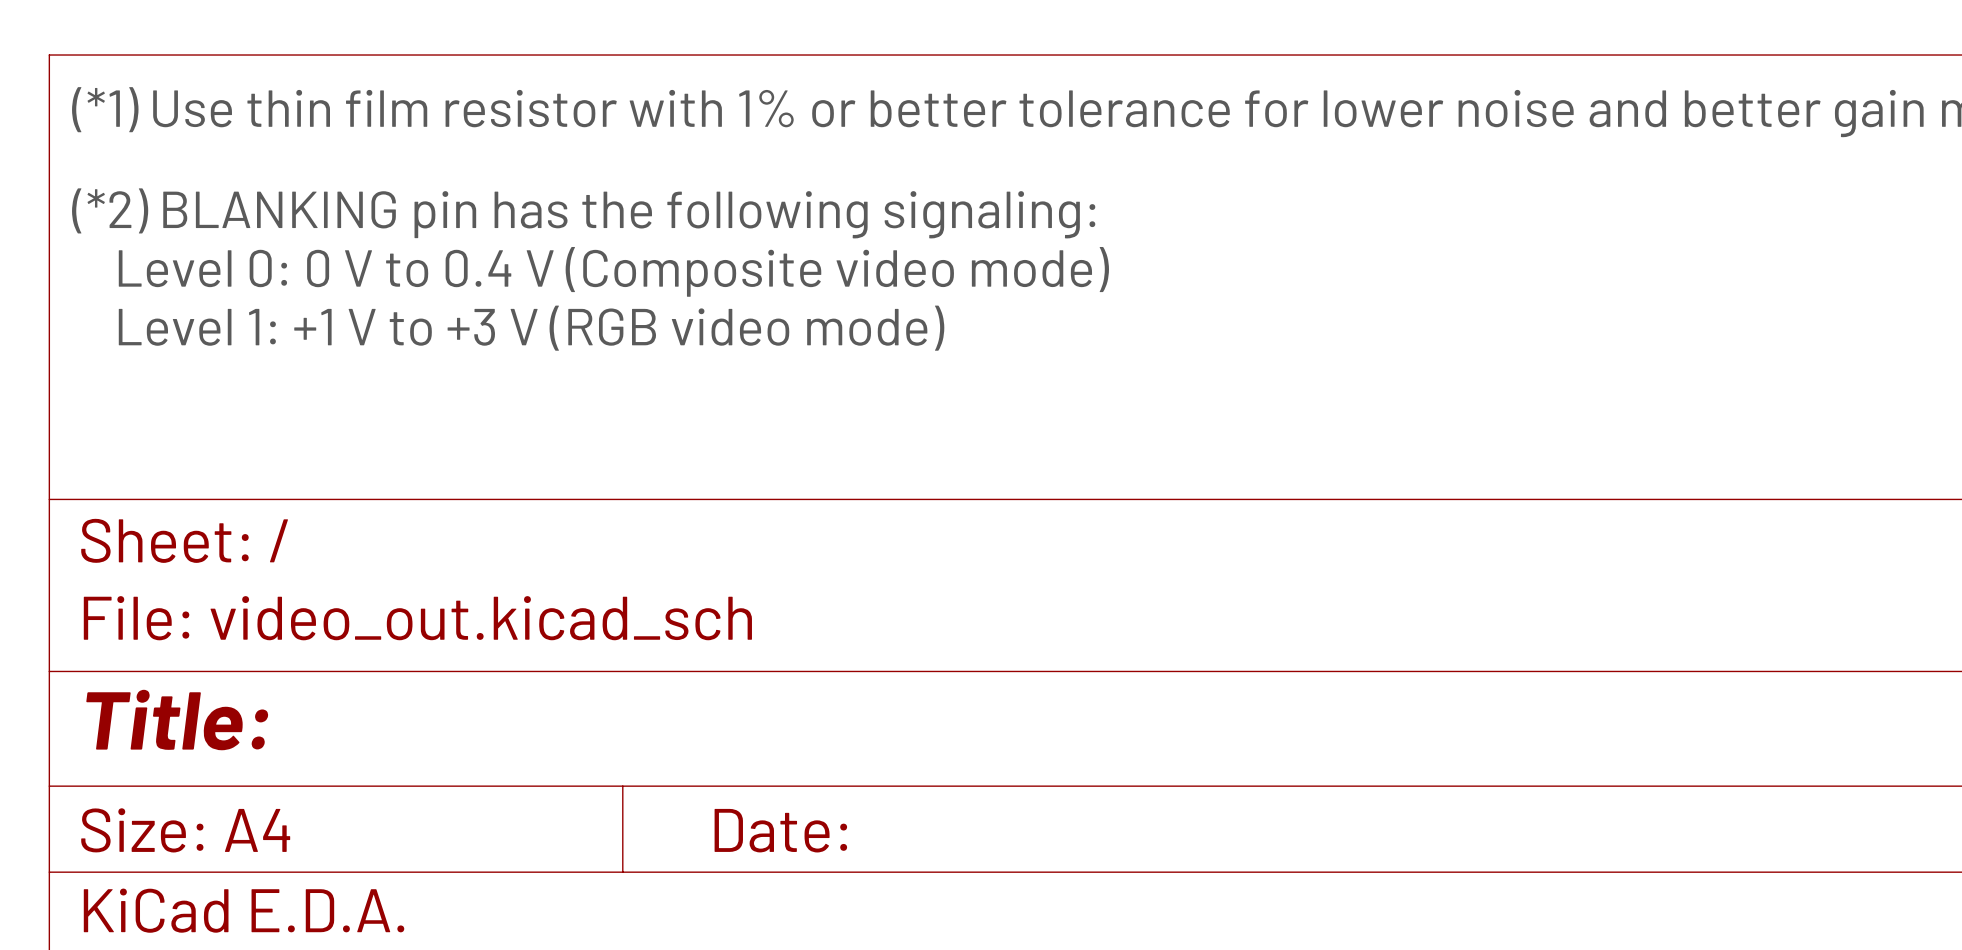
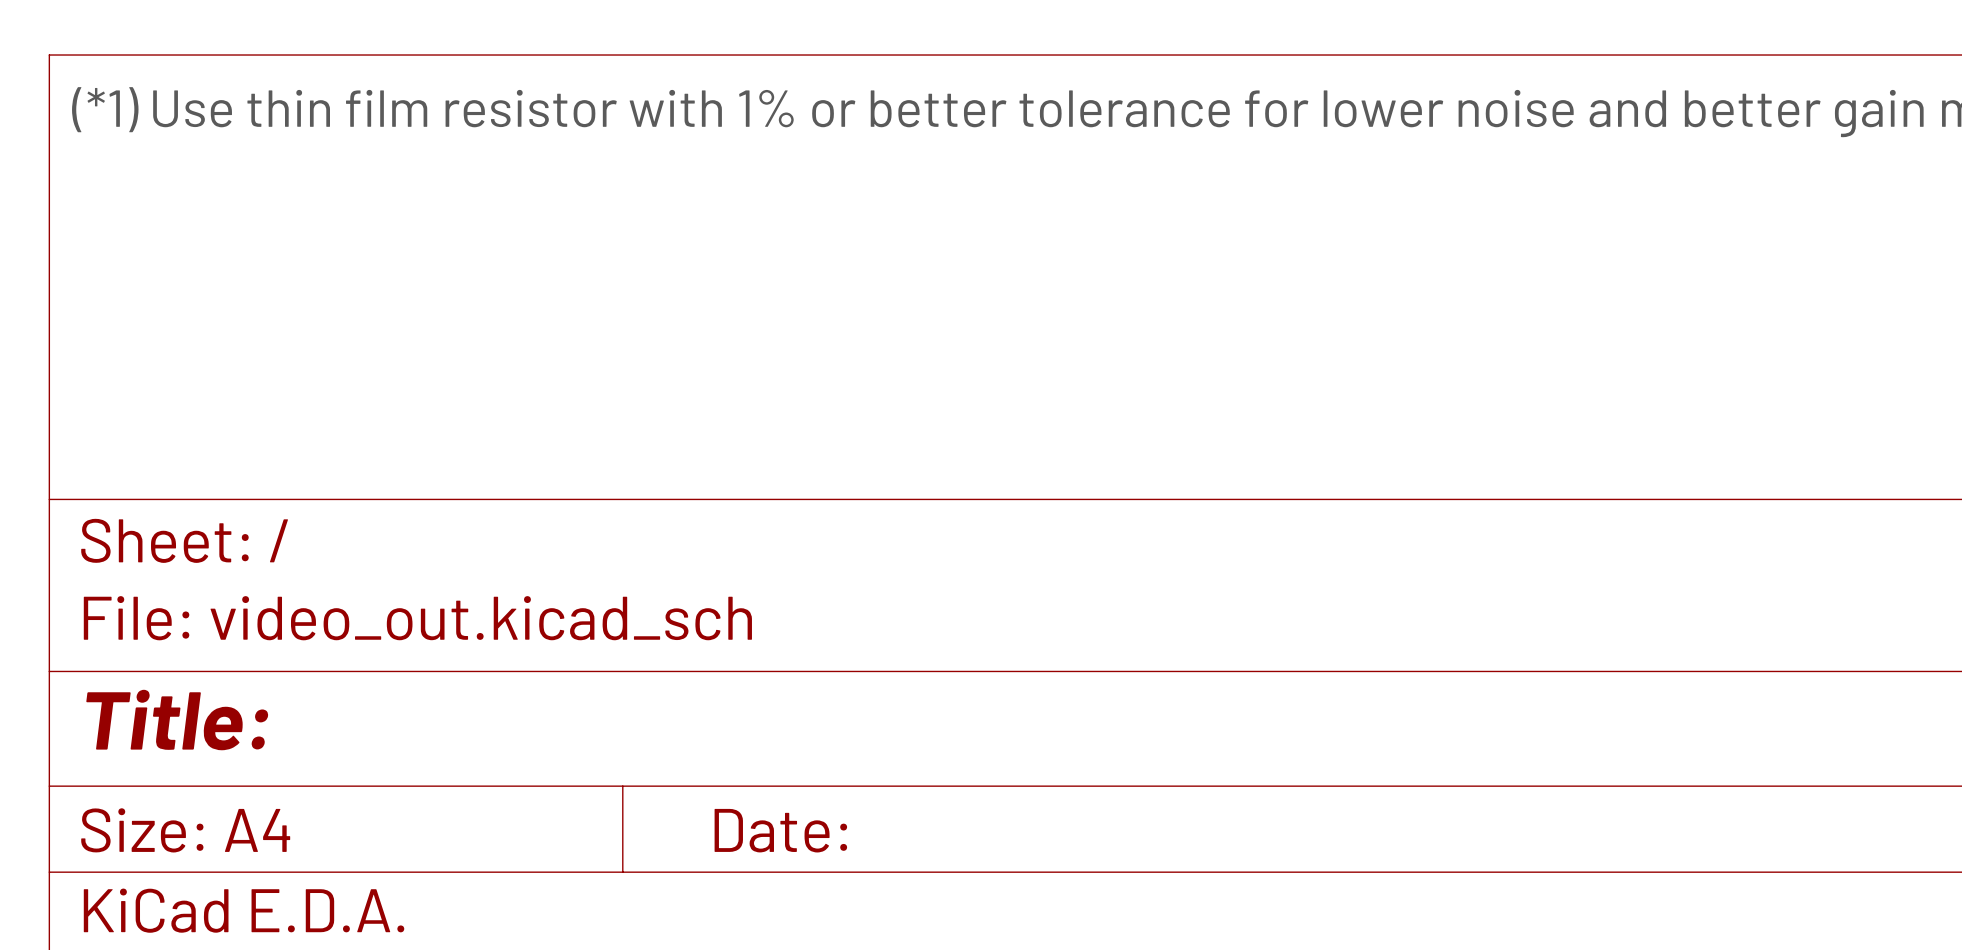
text: (*2) BLANKING pin has the following signaling: (583, 213) -> none
text: Level 0: 0 V to 0.4 V (Composite video mode) (613, 271) -> none
text: Level 1: +1 V to +3 V (RGB video mode) (531, 328) -> none

